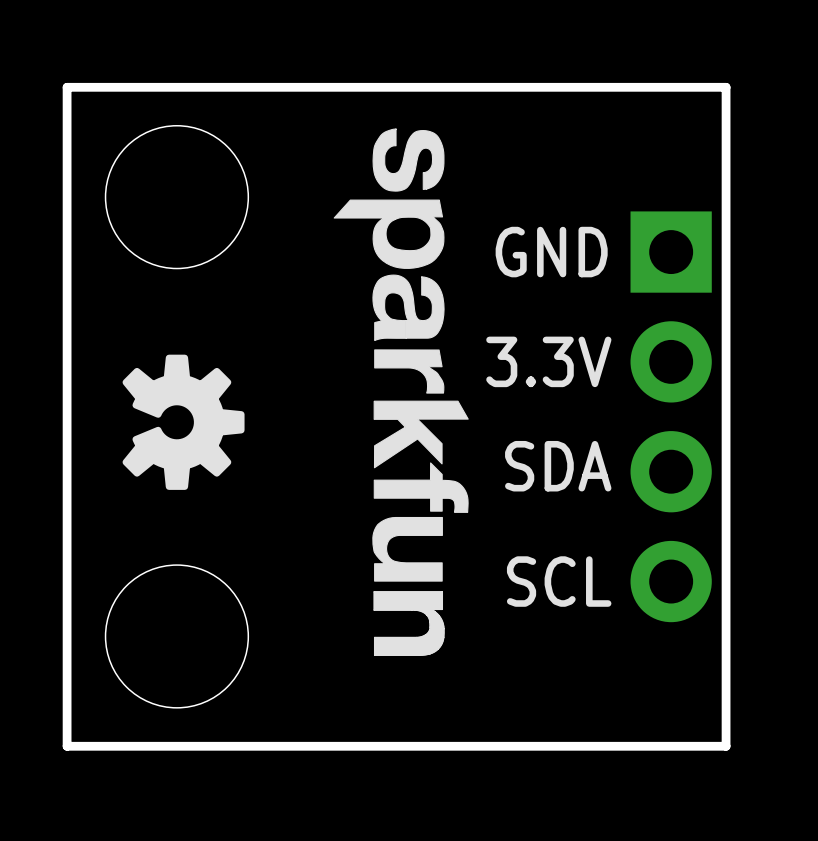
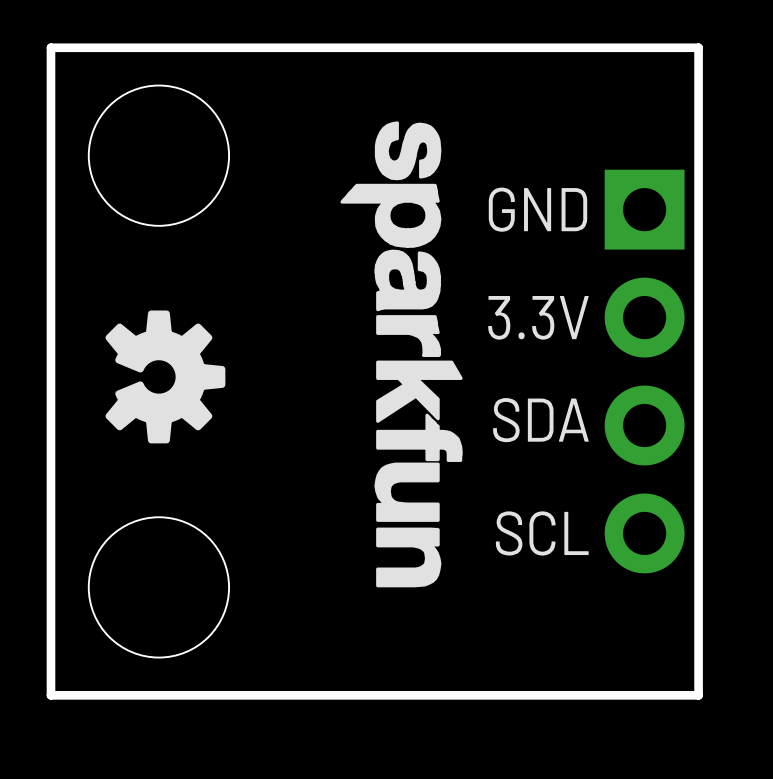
drawing shape: [333, 128, 469, 656] -> [340, 121, 463, 588]

